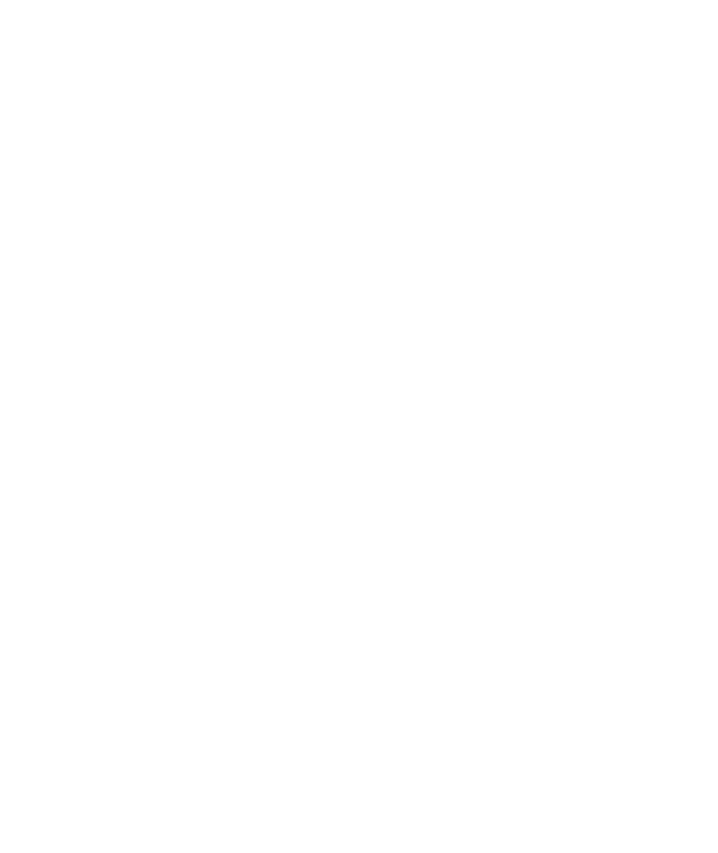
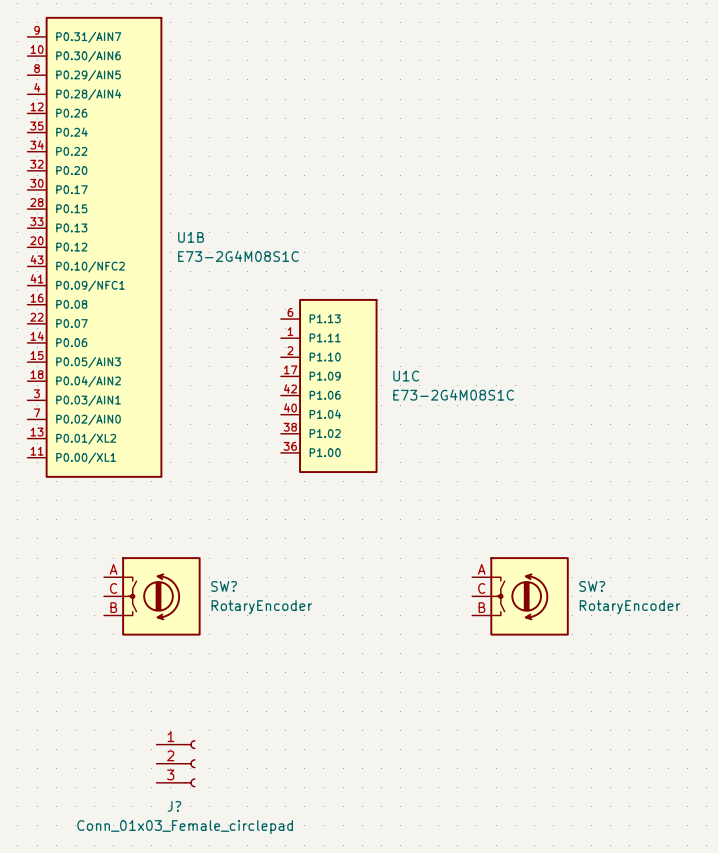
U1B: none -> E73-2G4M08S1C (94, 247)
U1C: none -> E73-2G4M08S1C (329, 385)
SW?: none -> RotaryEncoder (152, 596)
SW?: none -> RotaryEncoder (520, 596)
J?: none -> Conn_01x03_Female_circlepad (176, 763)

